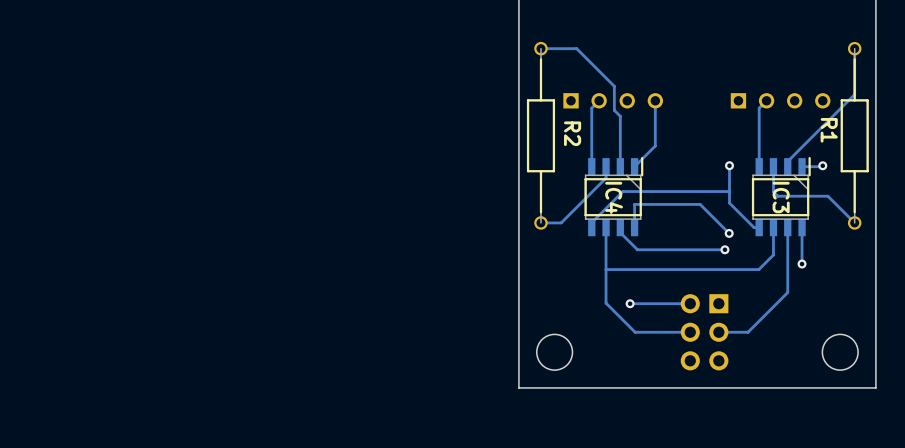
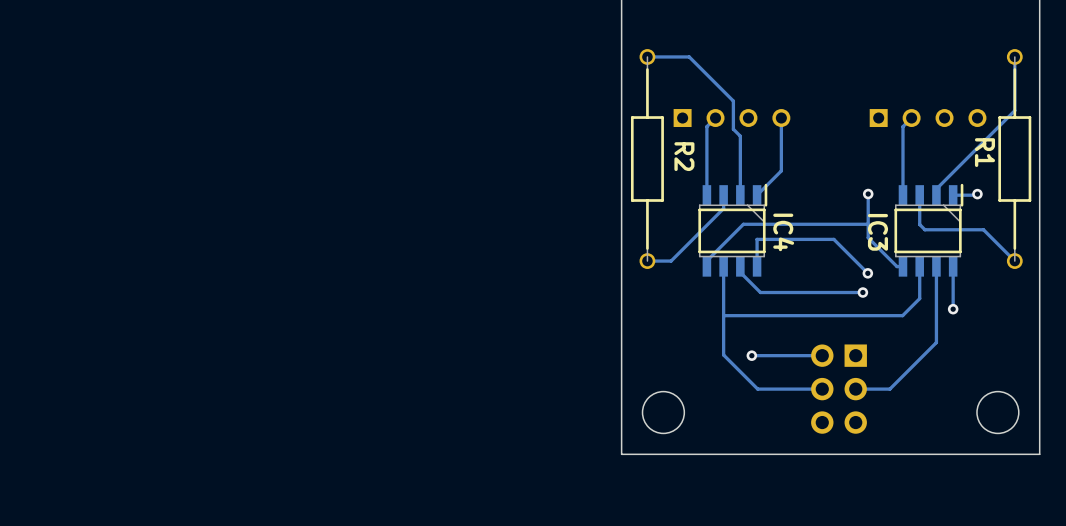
IC4 name position: IC4 (614, 197) -> IC4 (783, 232)
IC3 name position: IC3 (781, 197) -> IC3 (877, 232)

